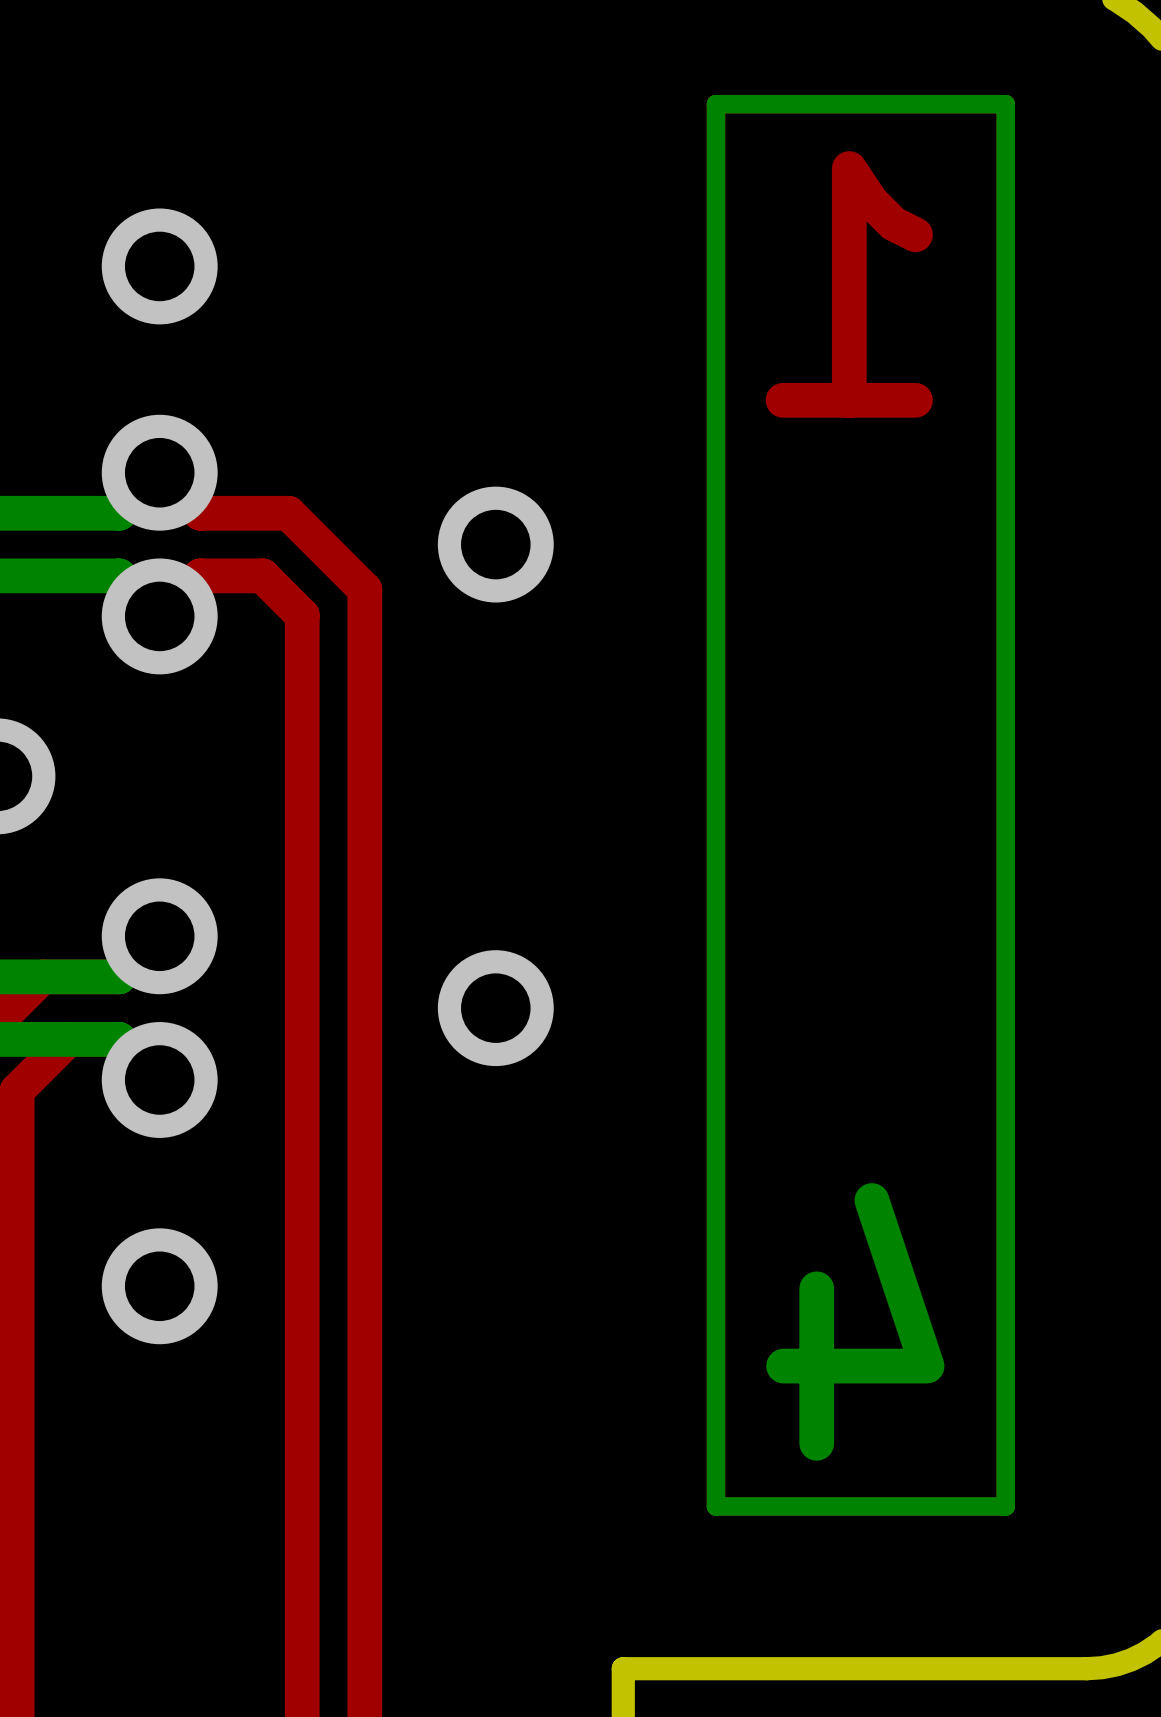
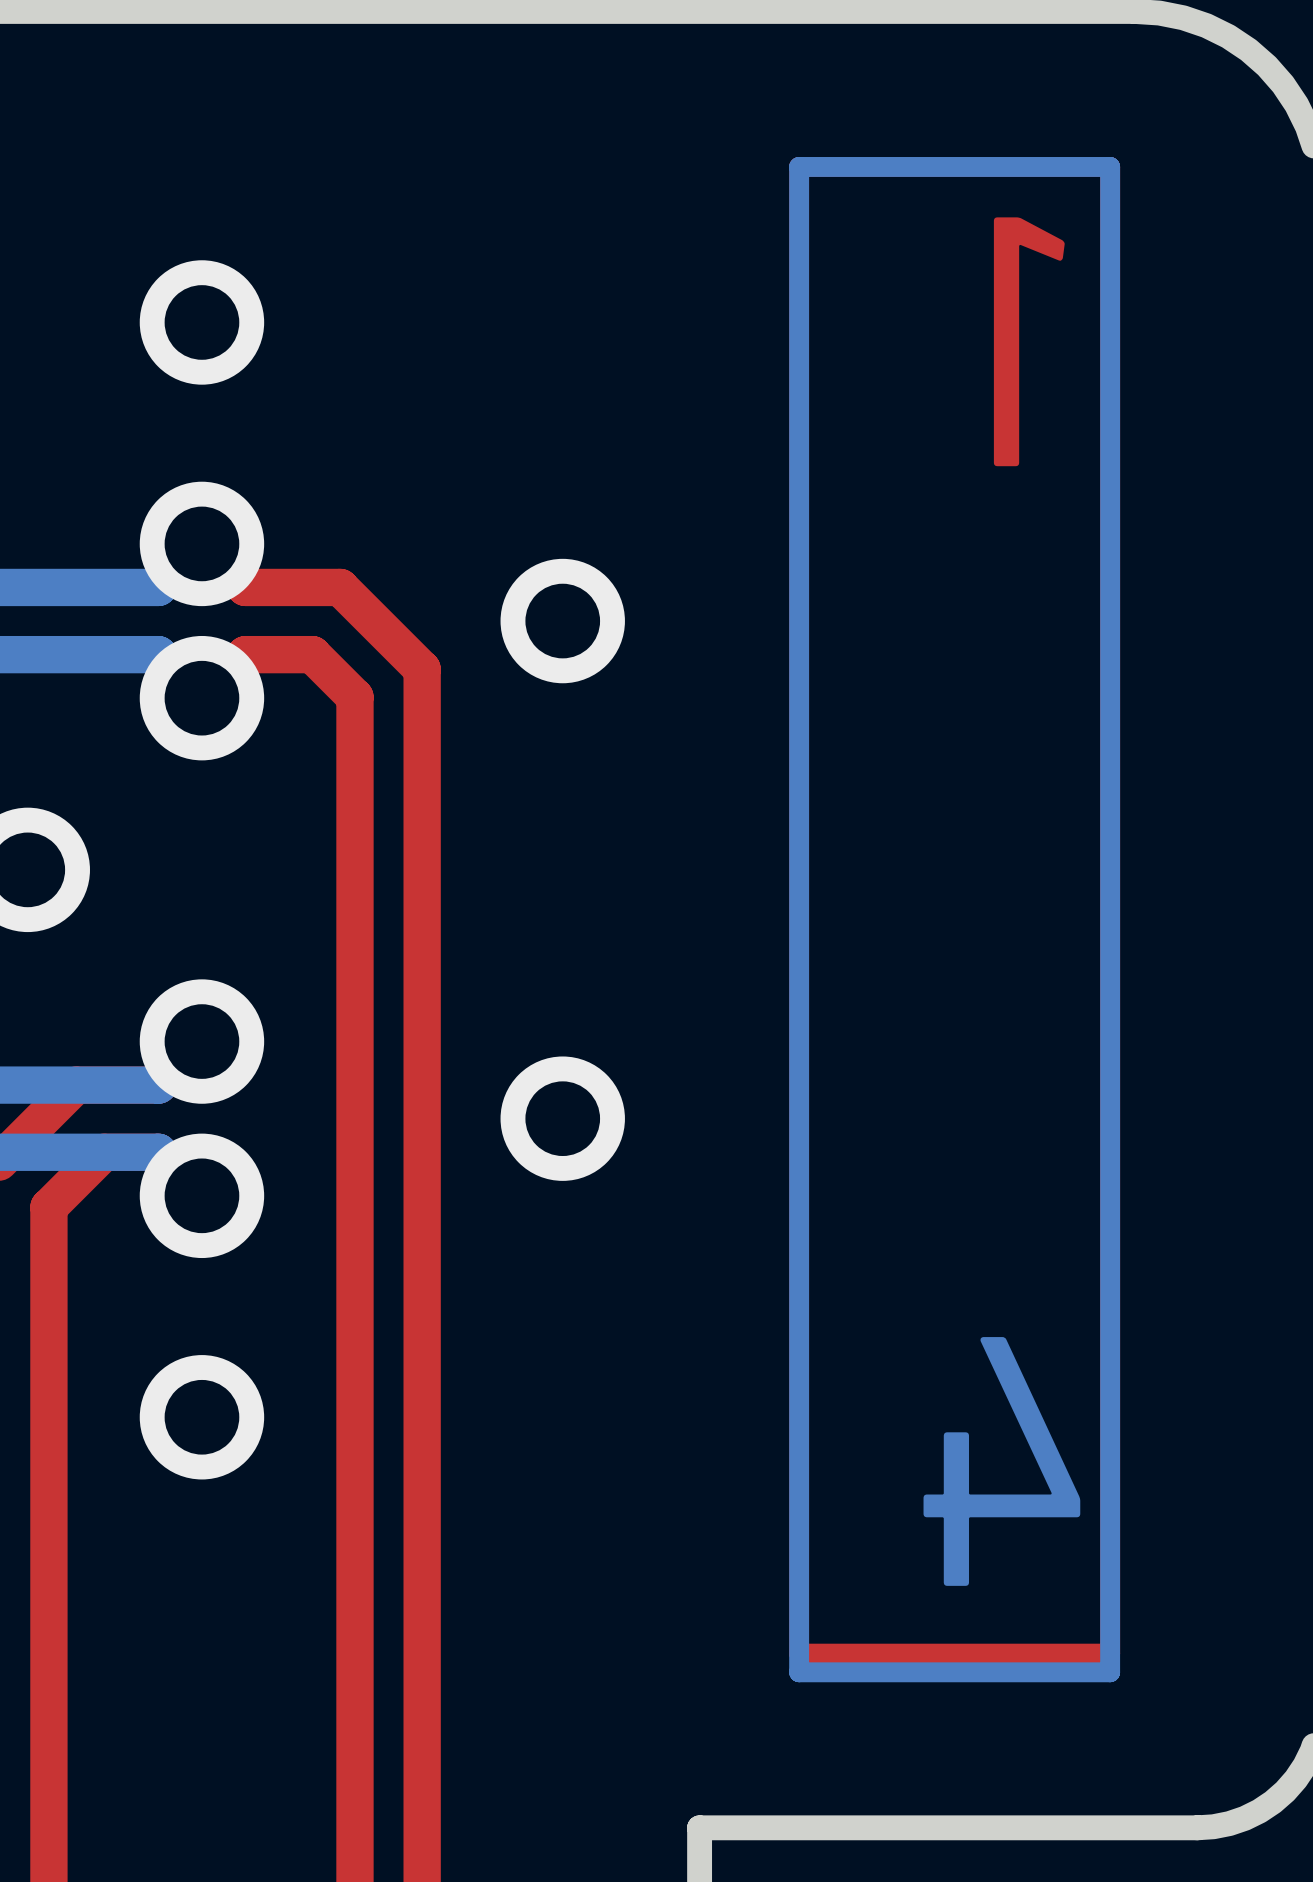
bottom track: (1005, 121) (1005, 104) (715, 104) (715, 121) -> (1110, 166) (799, 166)
bottom track: (1005, 1506) (715, 1506) -> (1110, 1653) (1110, 1672) (799, 1672) (799, 1653)

